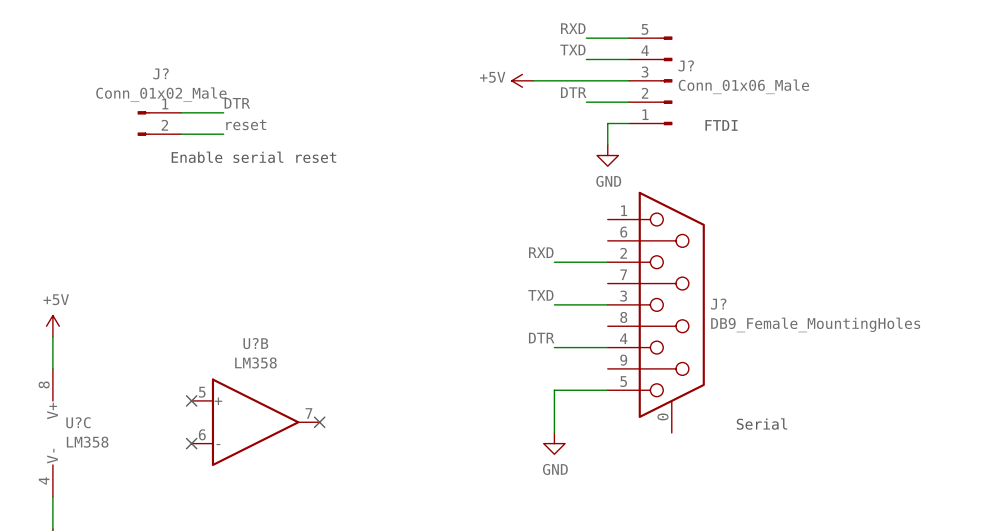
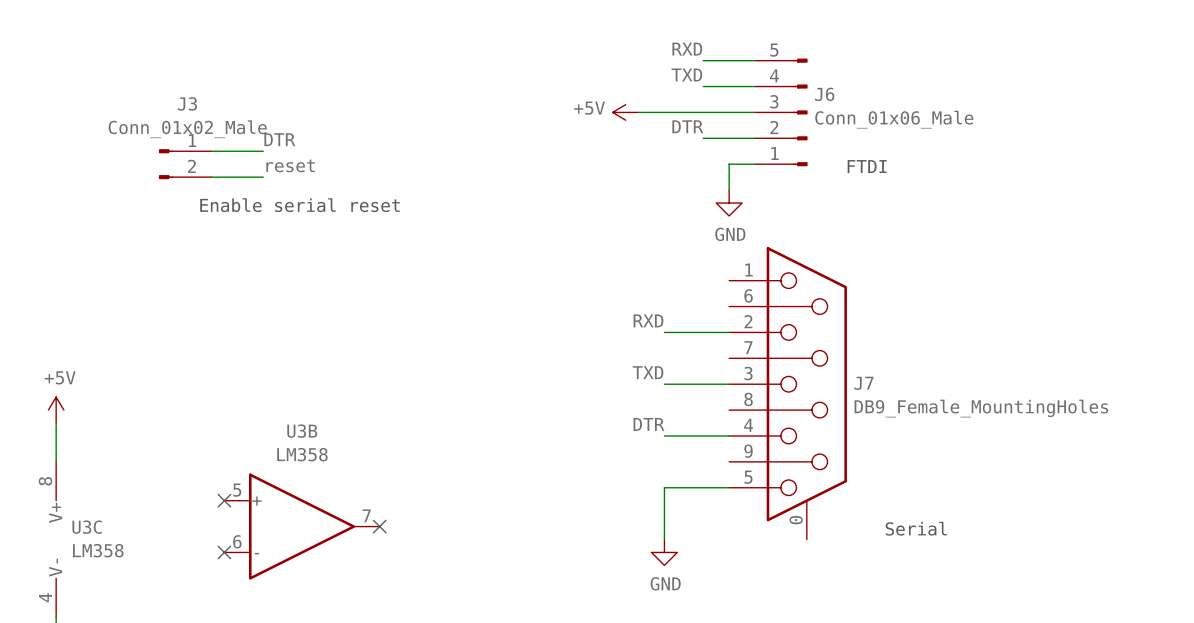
J? name: J? (686, 65) -> J6 (824, 94)
J? name: J? (161, 73) -> J3 (187, 103)
J? name: J? (718, 304) -> J7 (863, 383)
U?B name: U?B (255, 343) -> U3B (302, 431)
U?C name: U?C (78, 422) -> U3C (87, 527)

